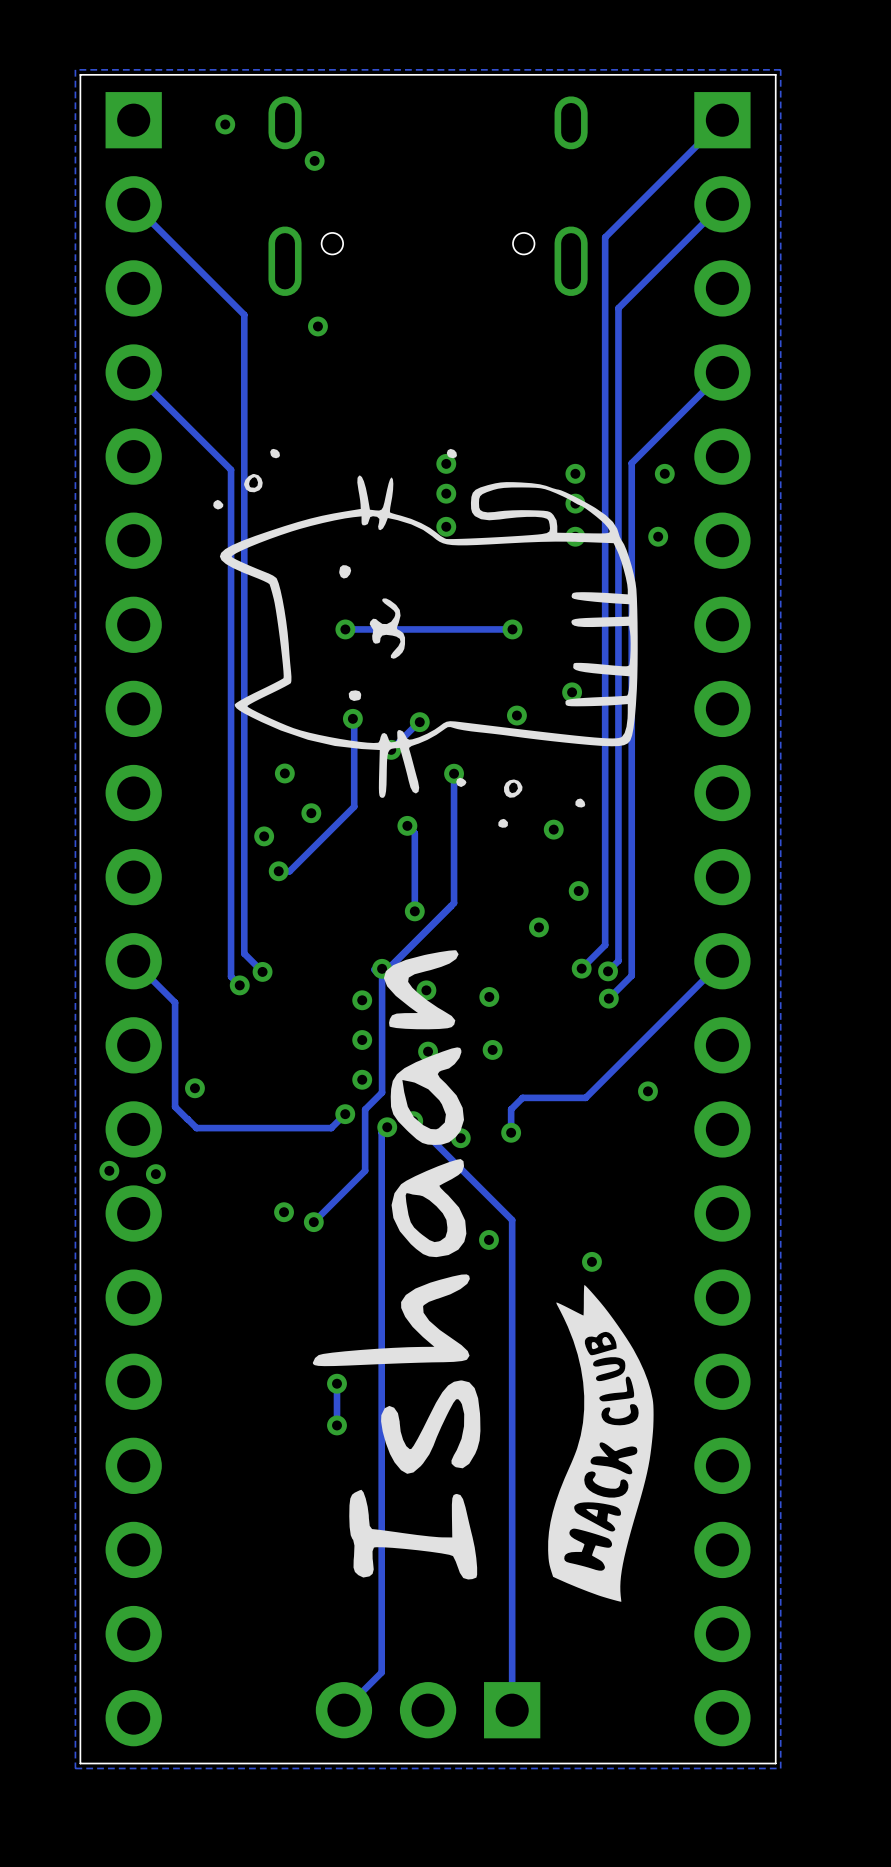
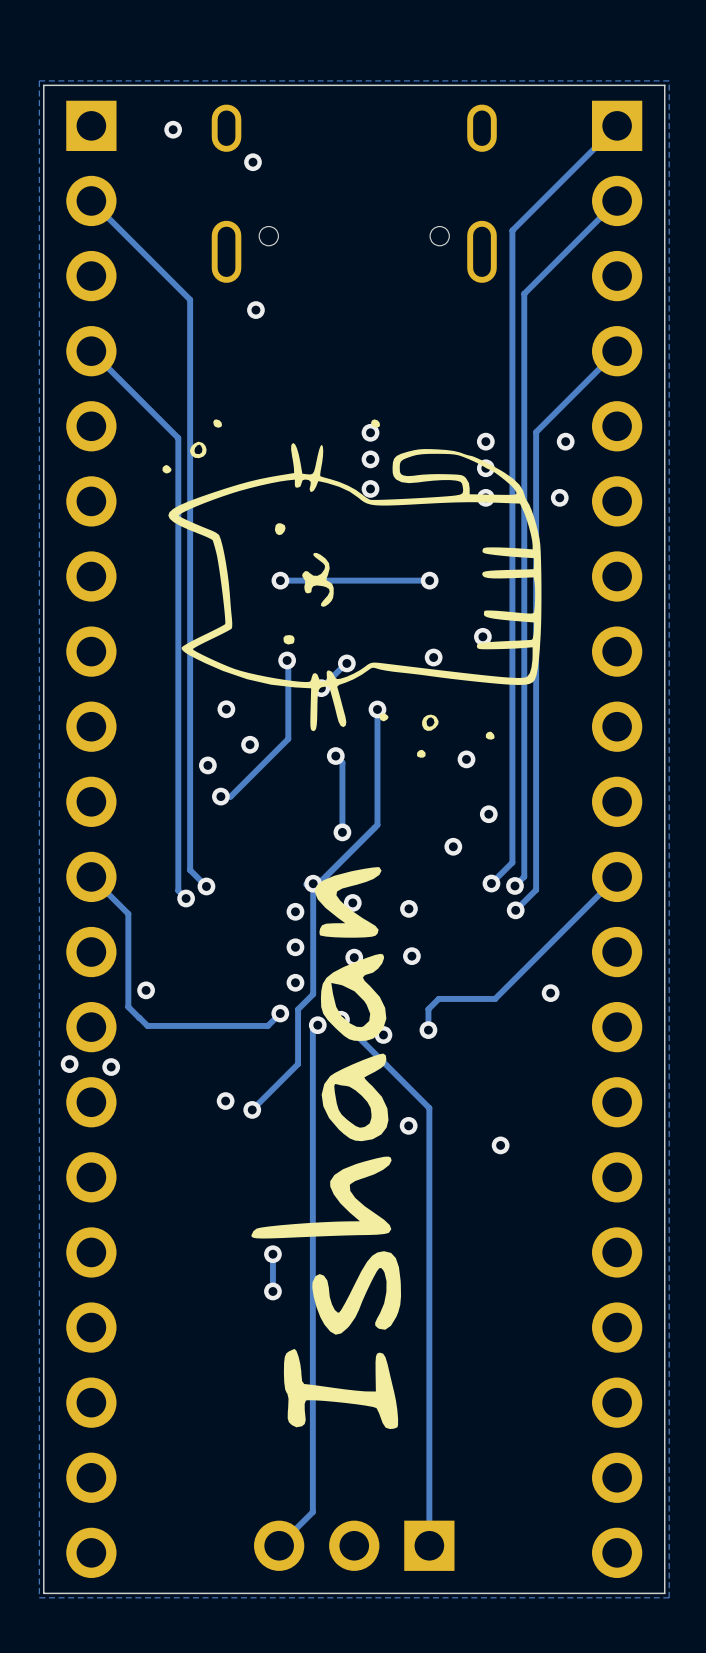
drawing: [548, 1285, 654, 1602] -> none

